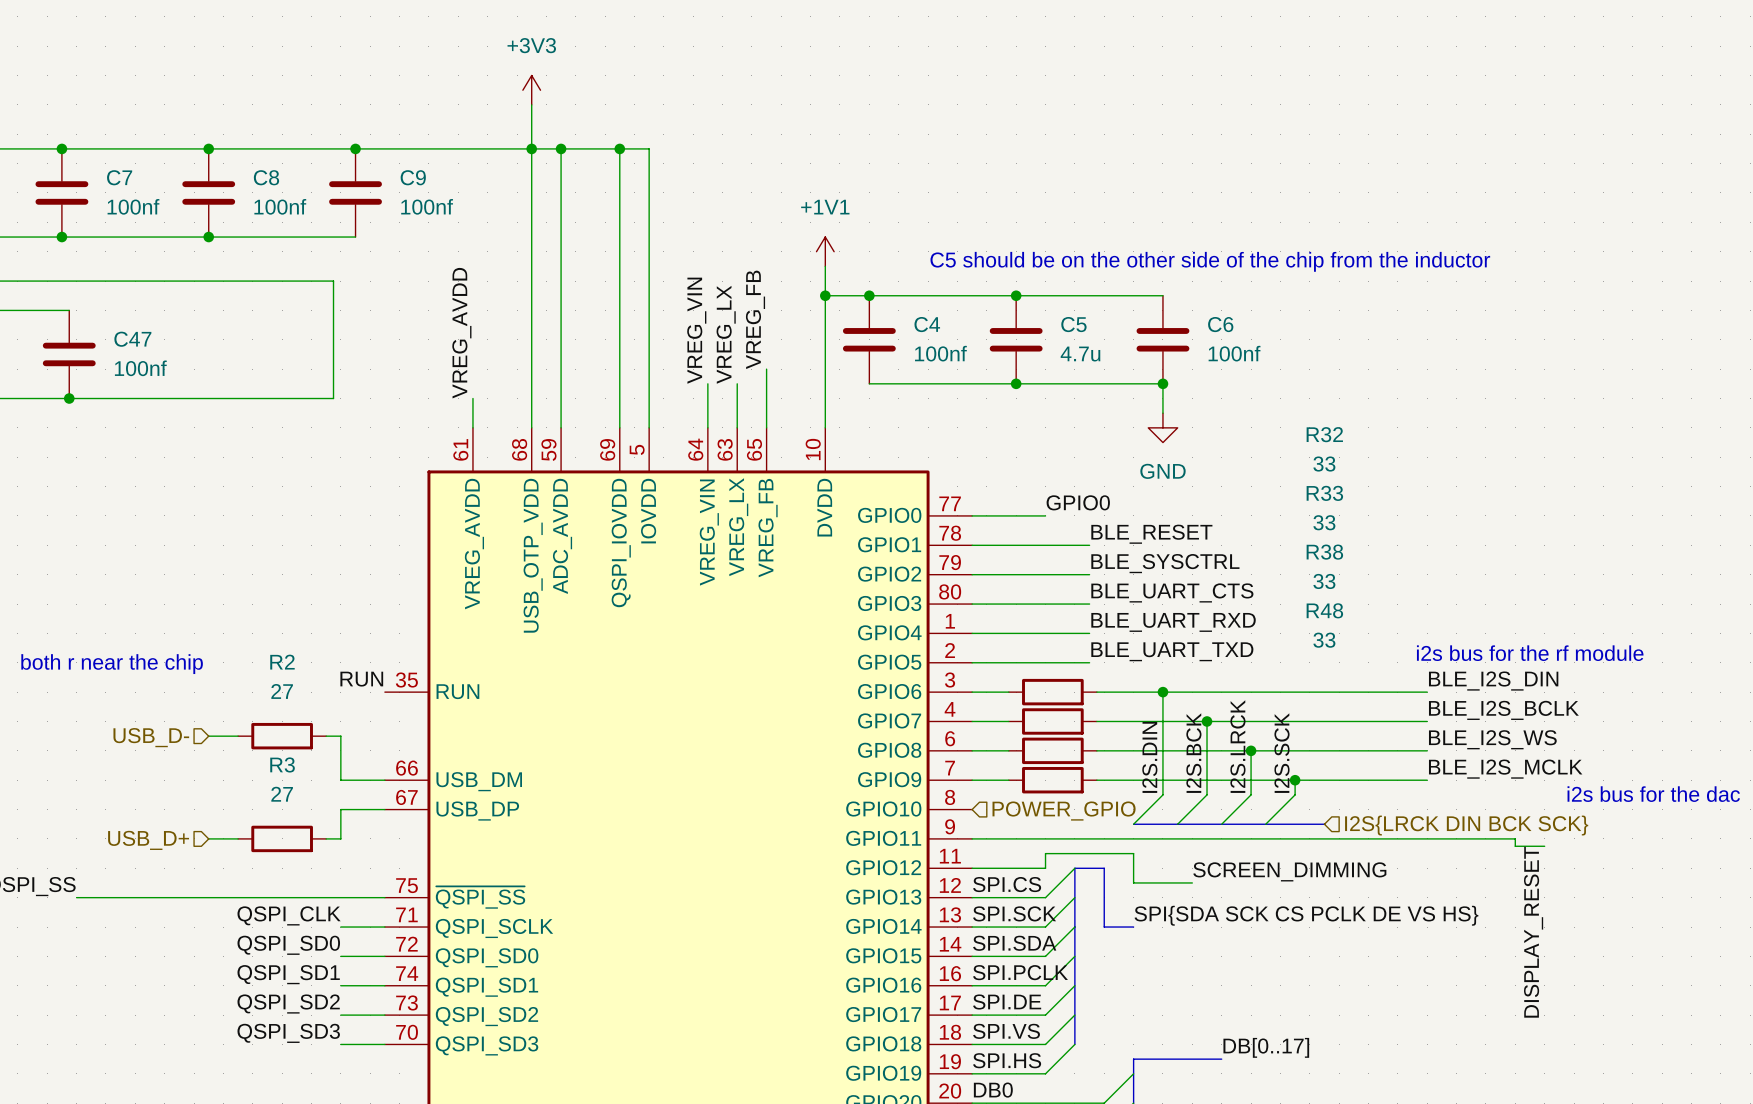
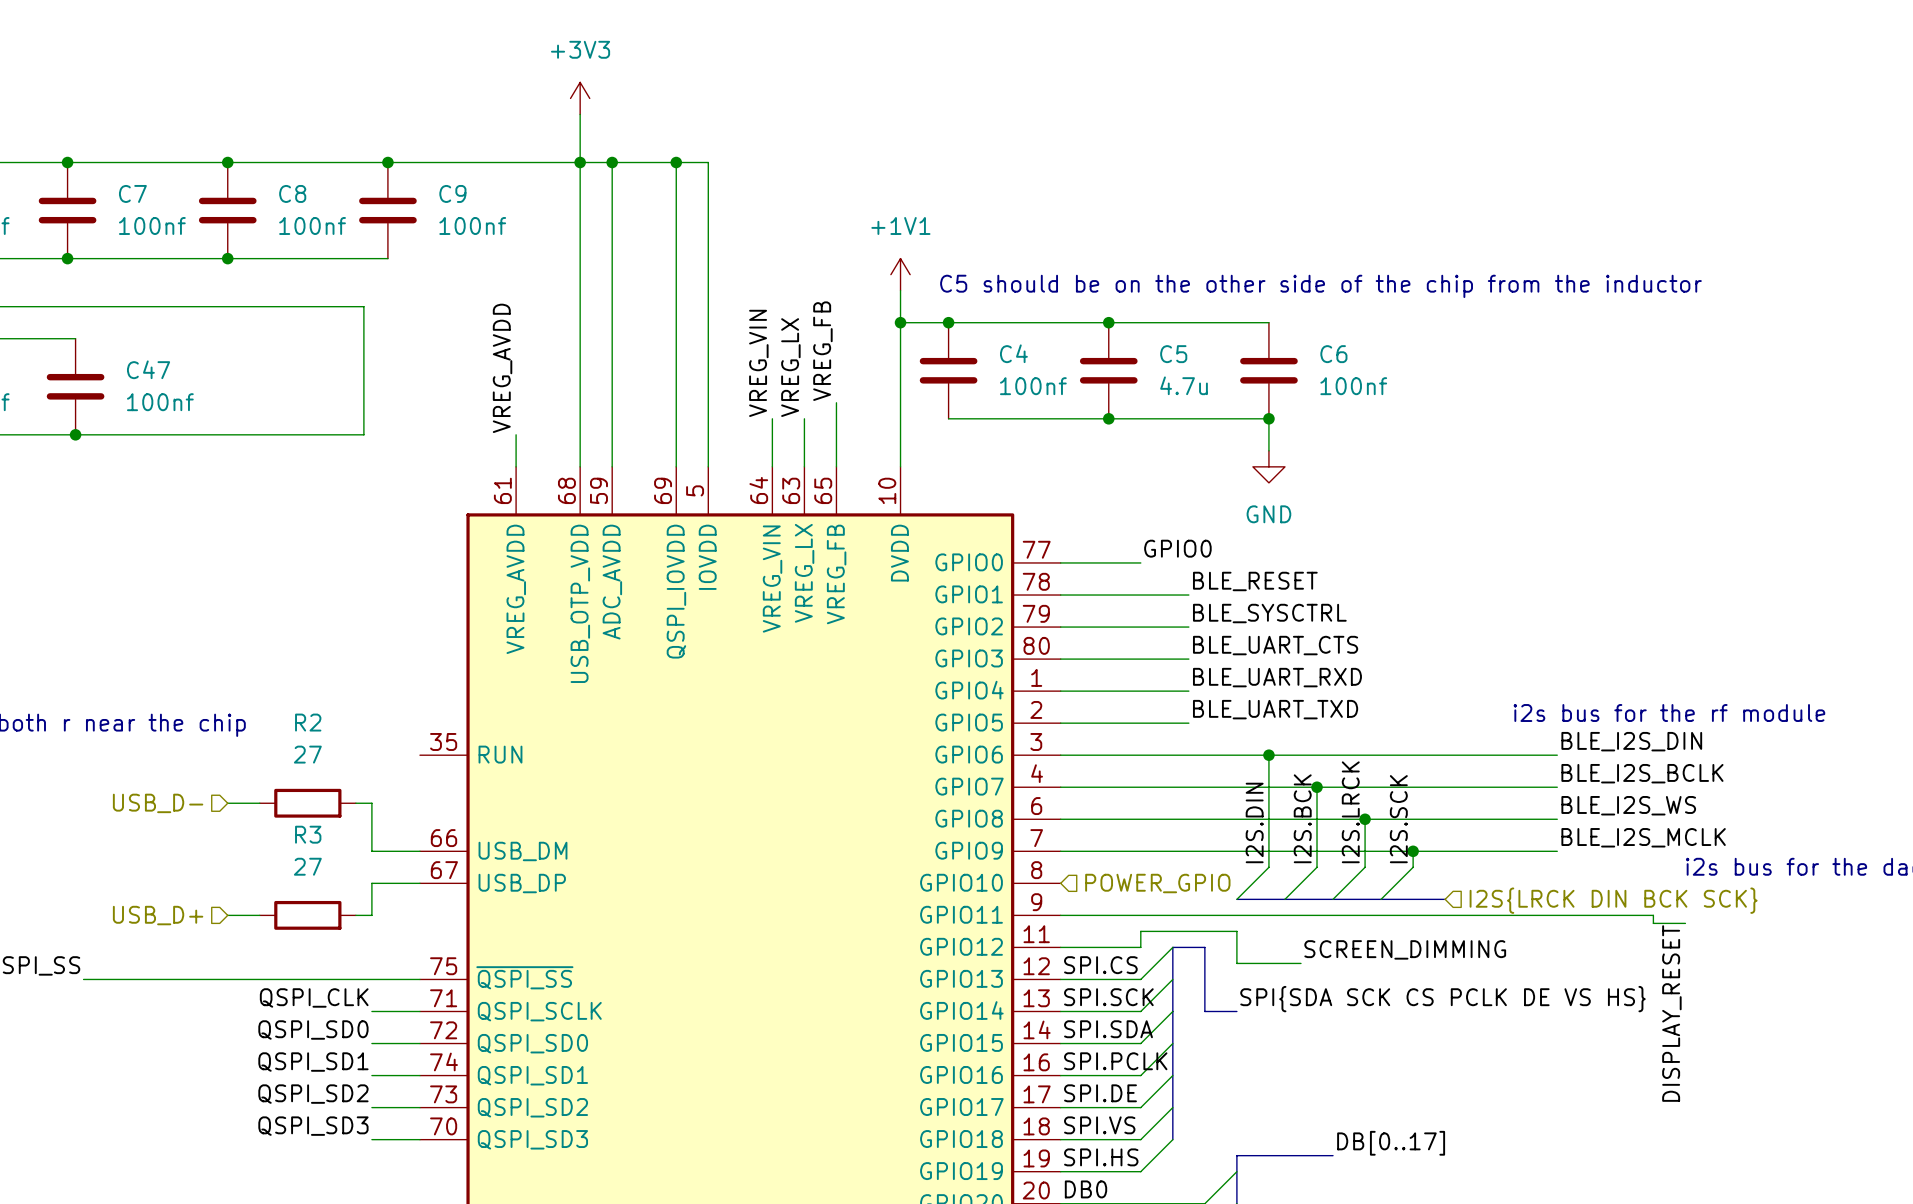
label: RUN (361, 679) -> none
wire: none -> (1100, 755) (1196, 755)
R32: 33 (1052, 692) -> none
wire: none -> (1100, 787) (1196, 787)
R33: 33 (1052, 721) -> none
wire: none -> (1100, 819) (1196, 819)
R38: 33 (1052, 750) -> none
wire: none -> (1100, 851) (1196, 851)
R48: 33 (1052, 780) -> none

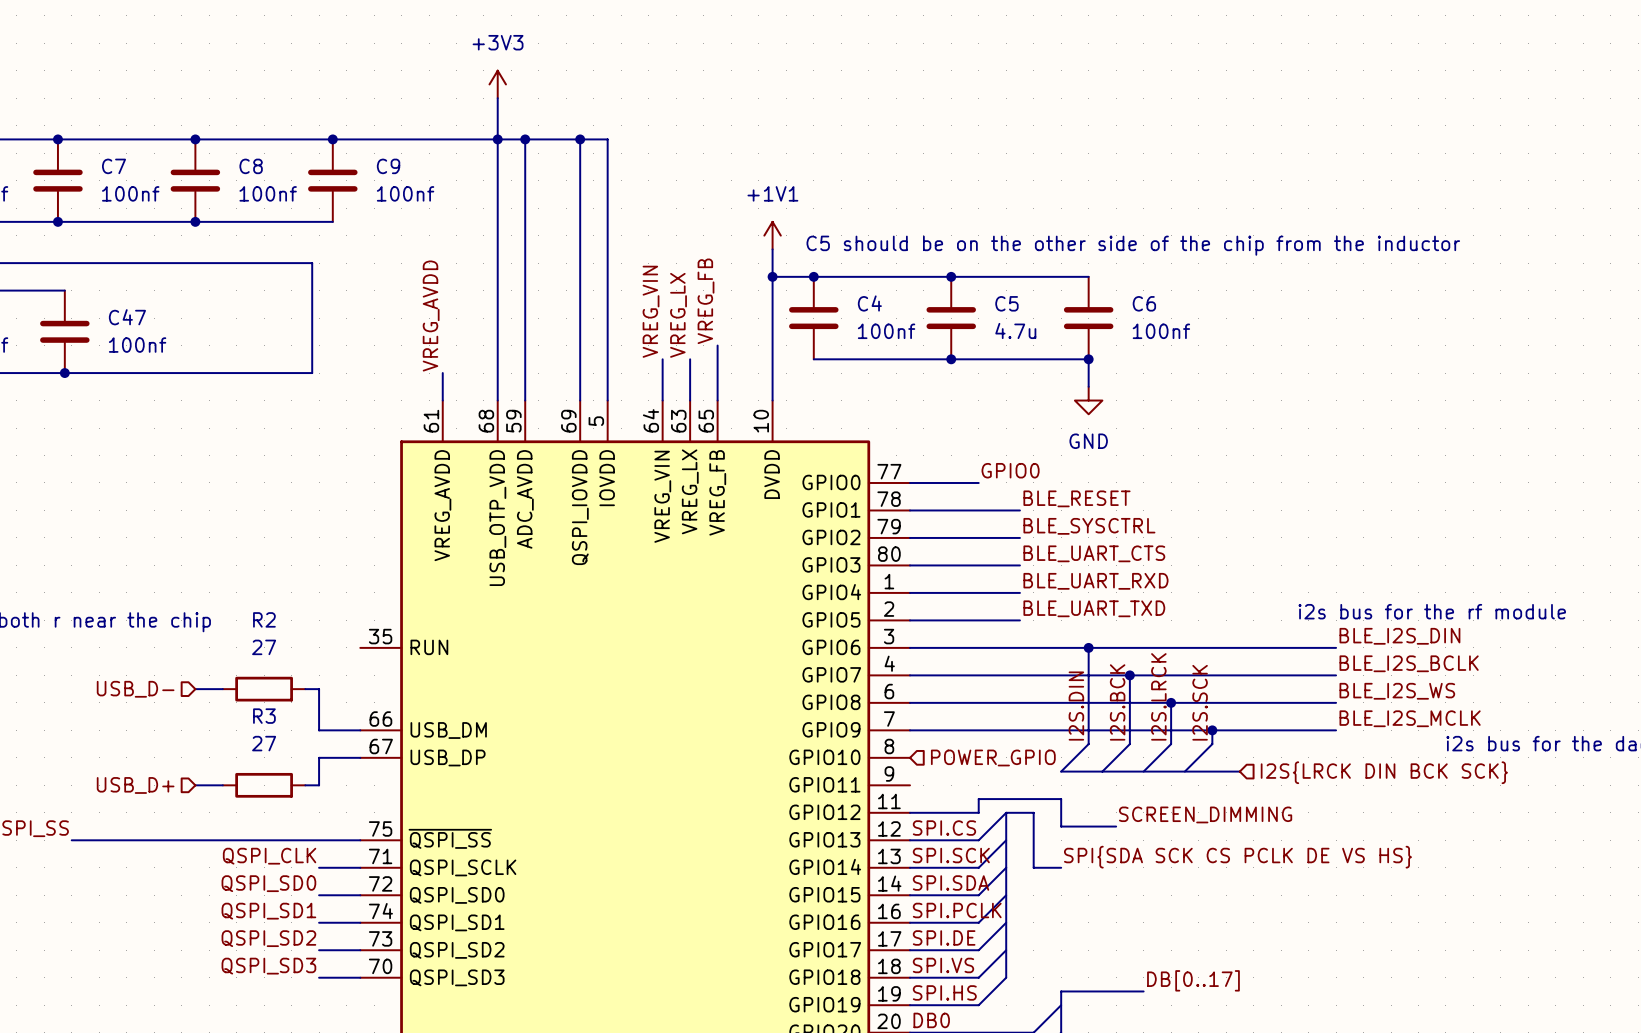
wire: (1060, 915) (1653, 915) (1653, 923) (1685, 923) -> none
label: DISPLAY_RESET (1671, 1013) -> none

